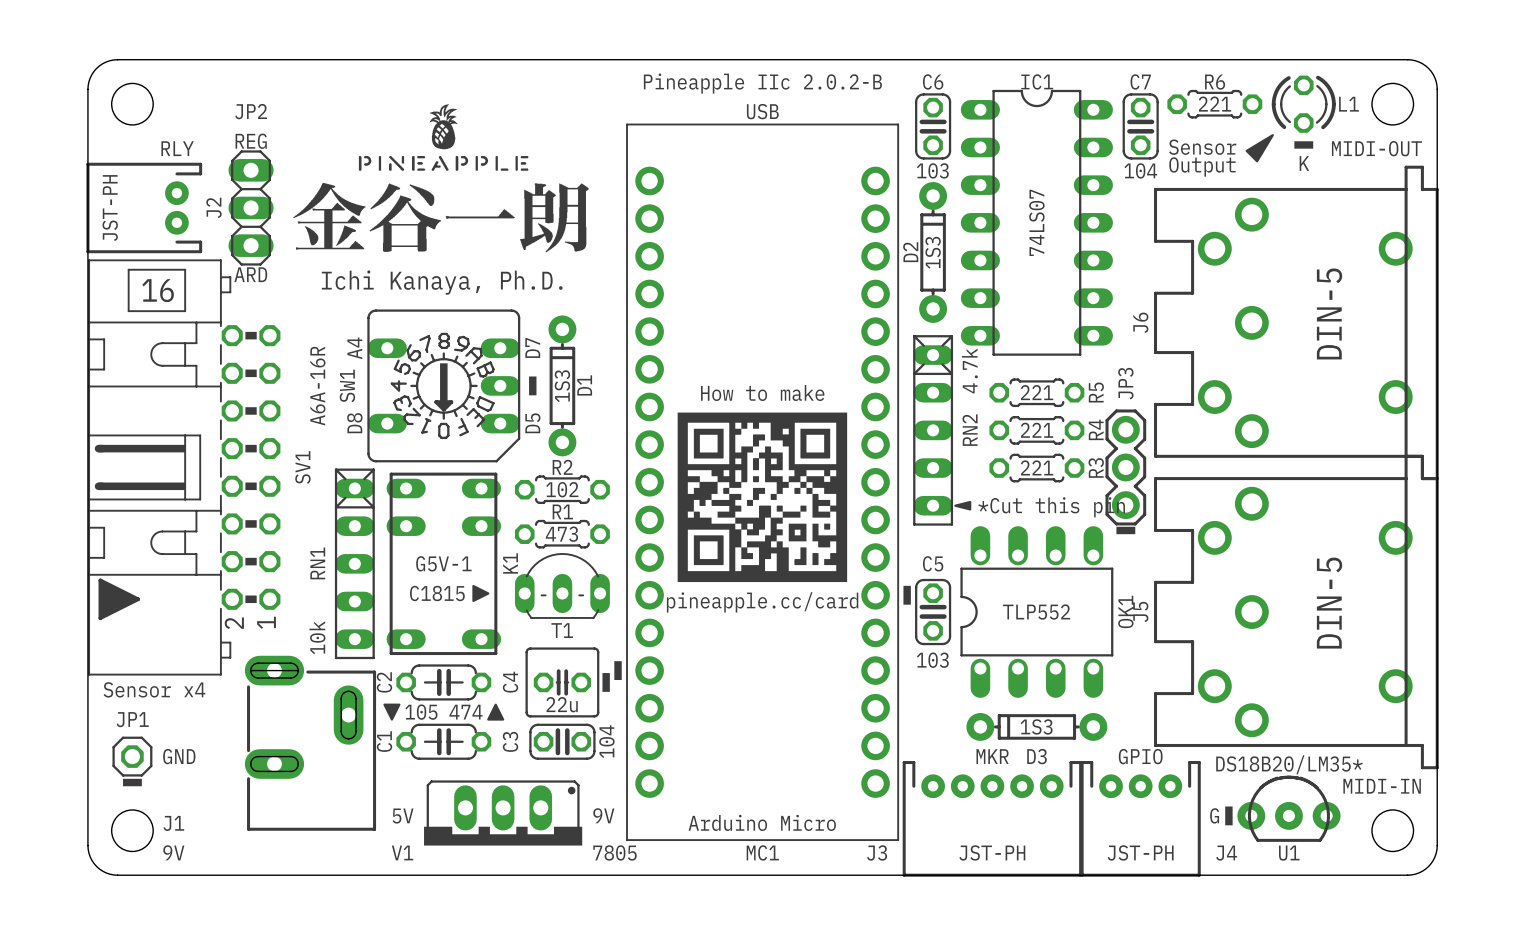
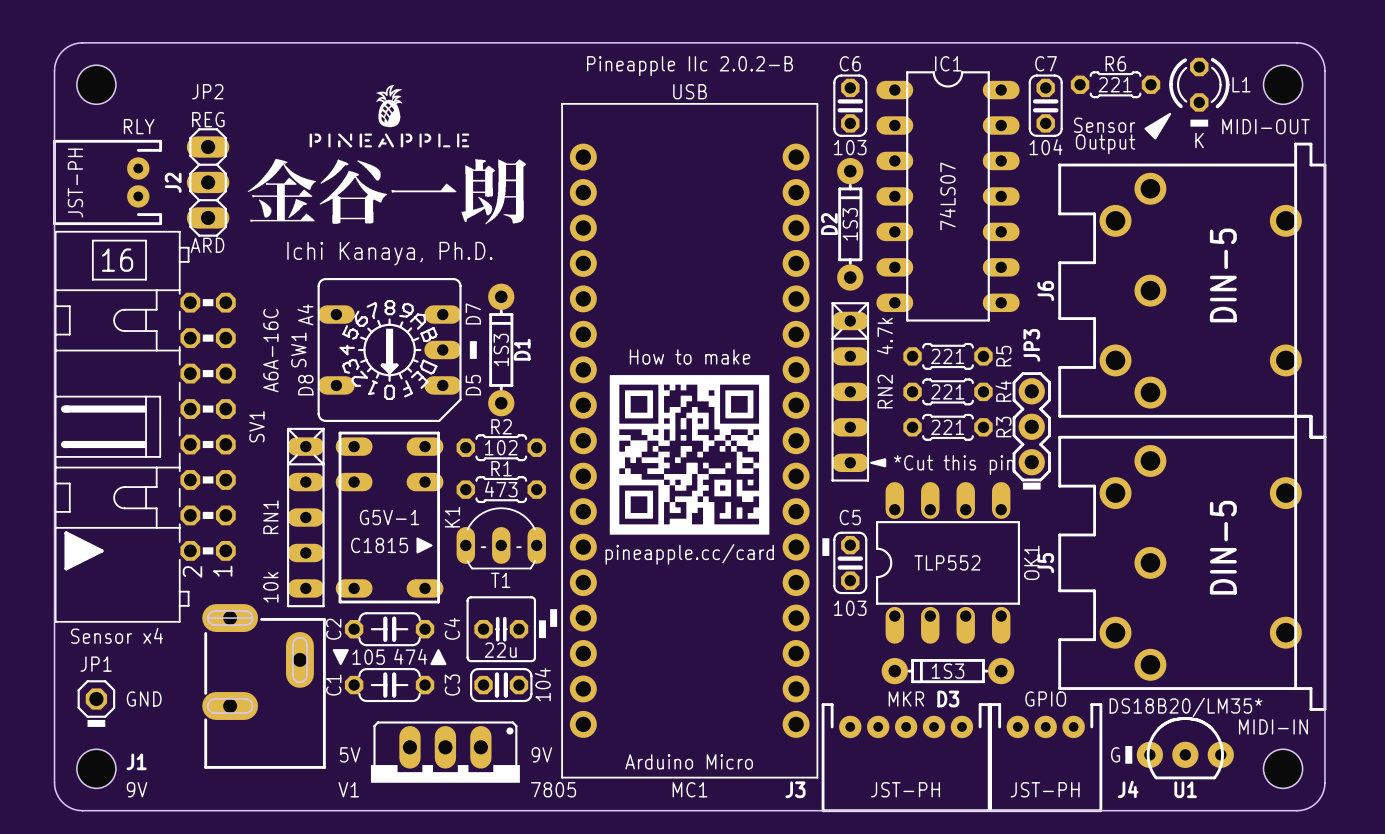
text: A6A-16R (317, 386) -> A6A-16C (270, 350)
C5 rotation: 0° (933, 612) -> 180° (850, 562)

